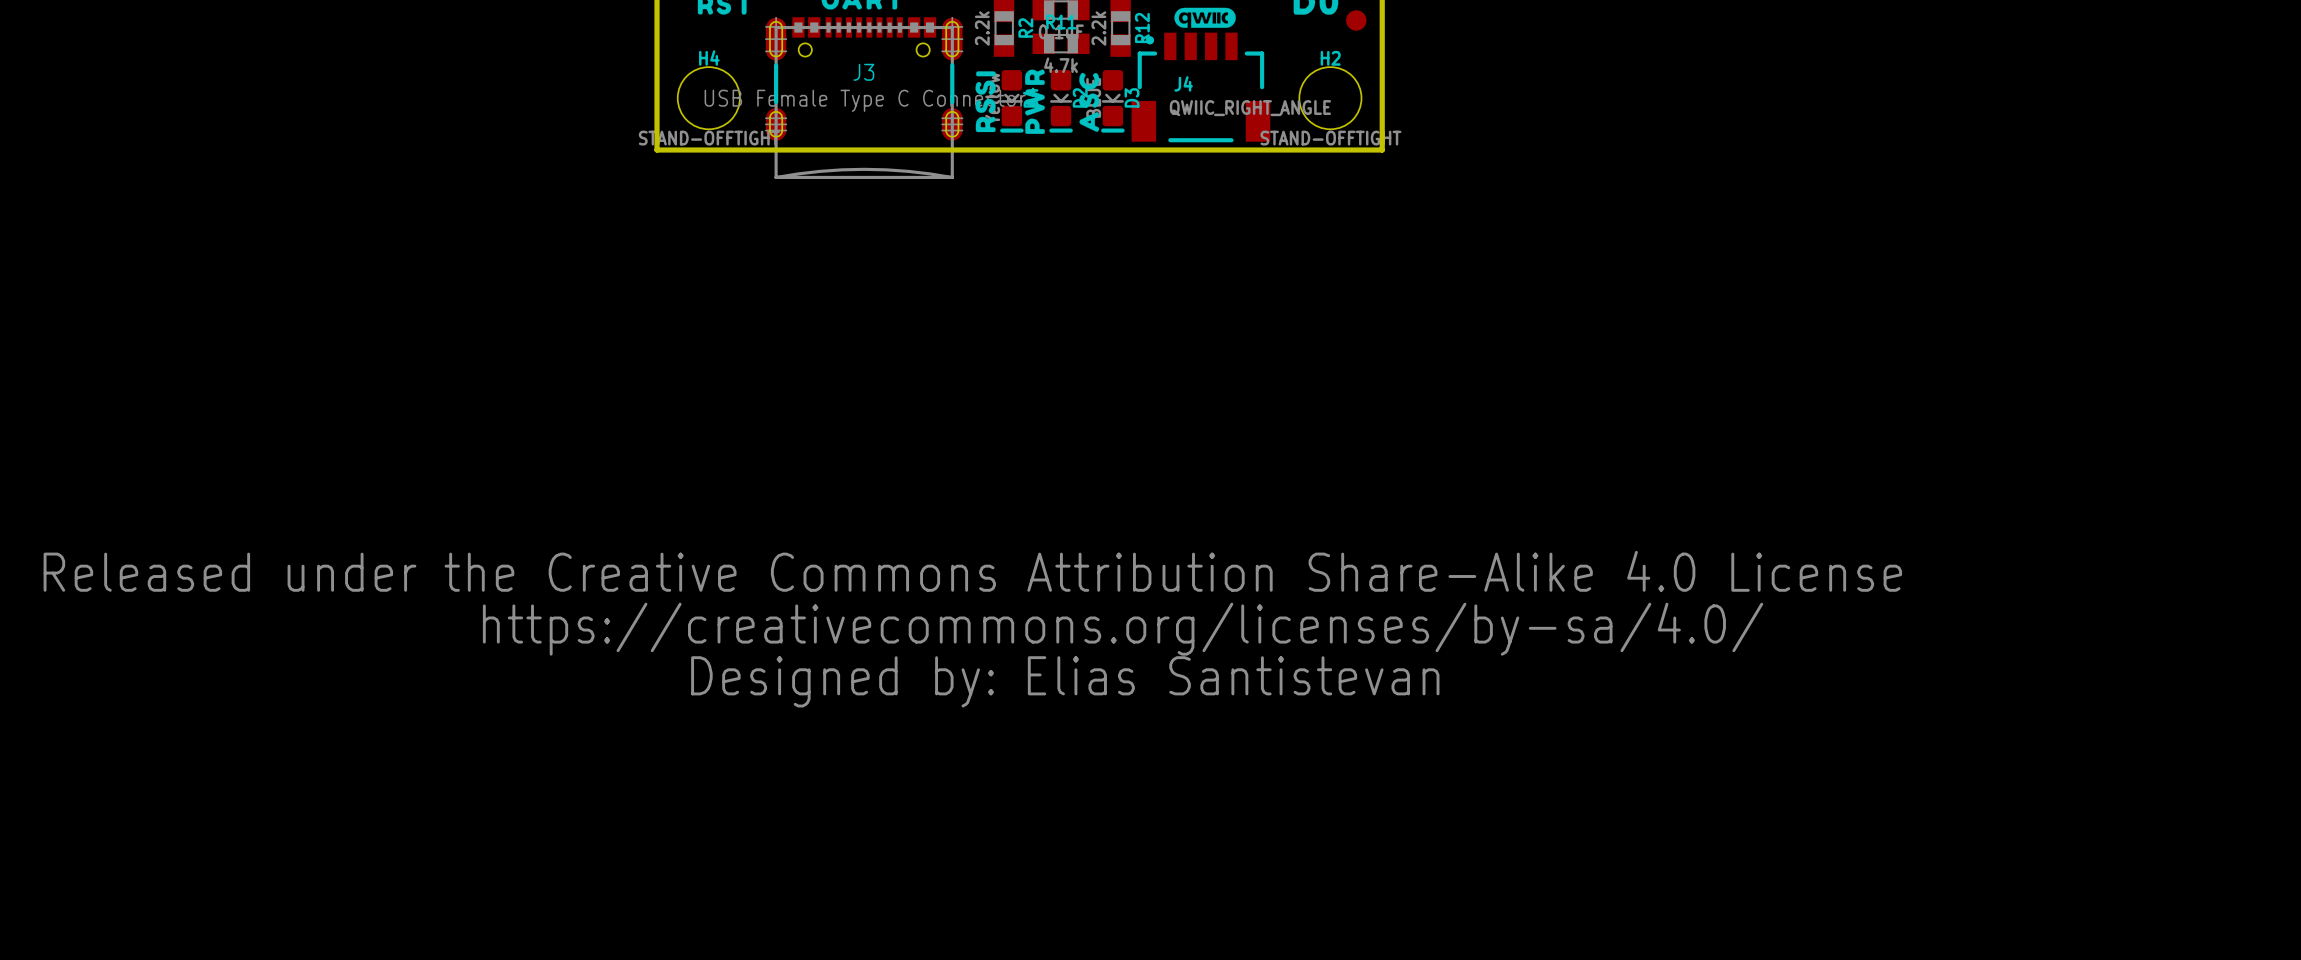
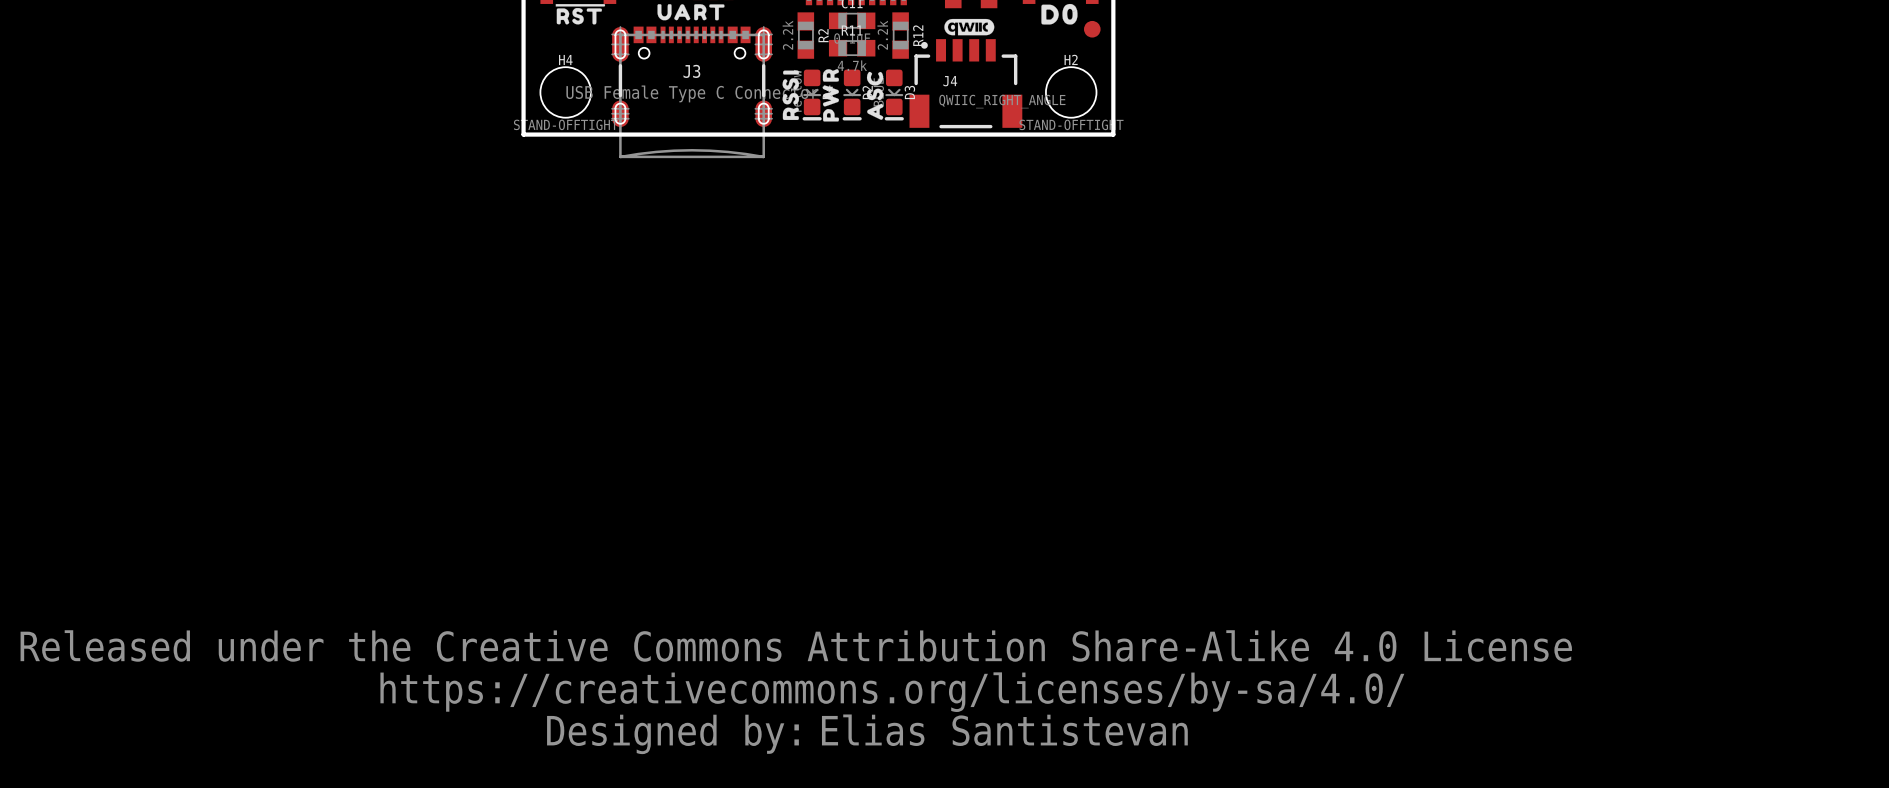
drawing position: (972, 629) -> (796, 692)
text position: Elias Santistevan (1233, 675) -> Elias Santistevan (1004, 730)

